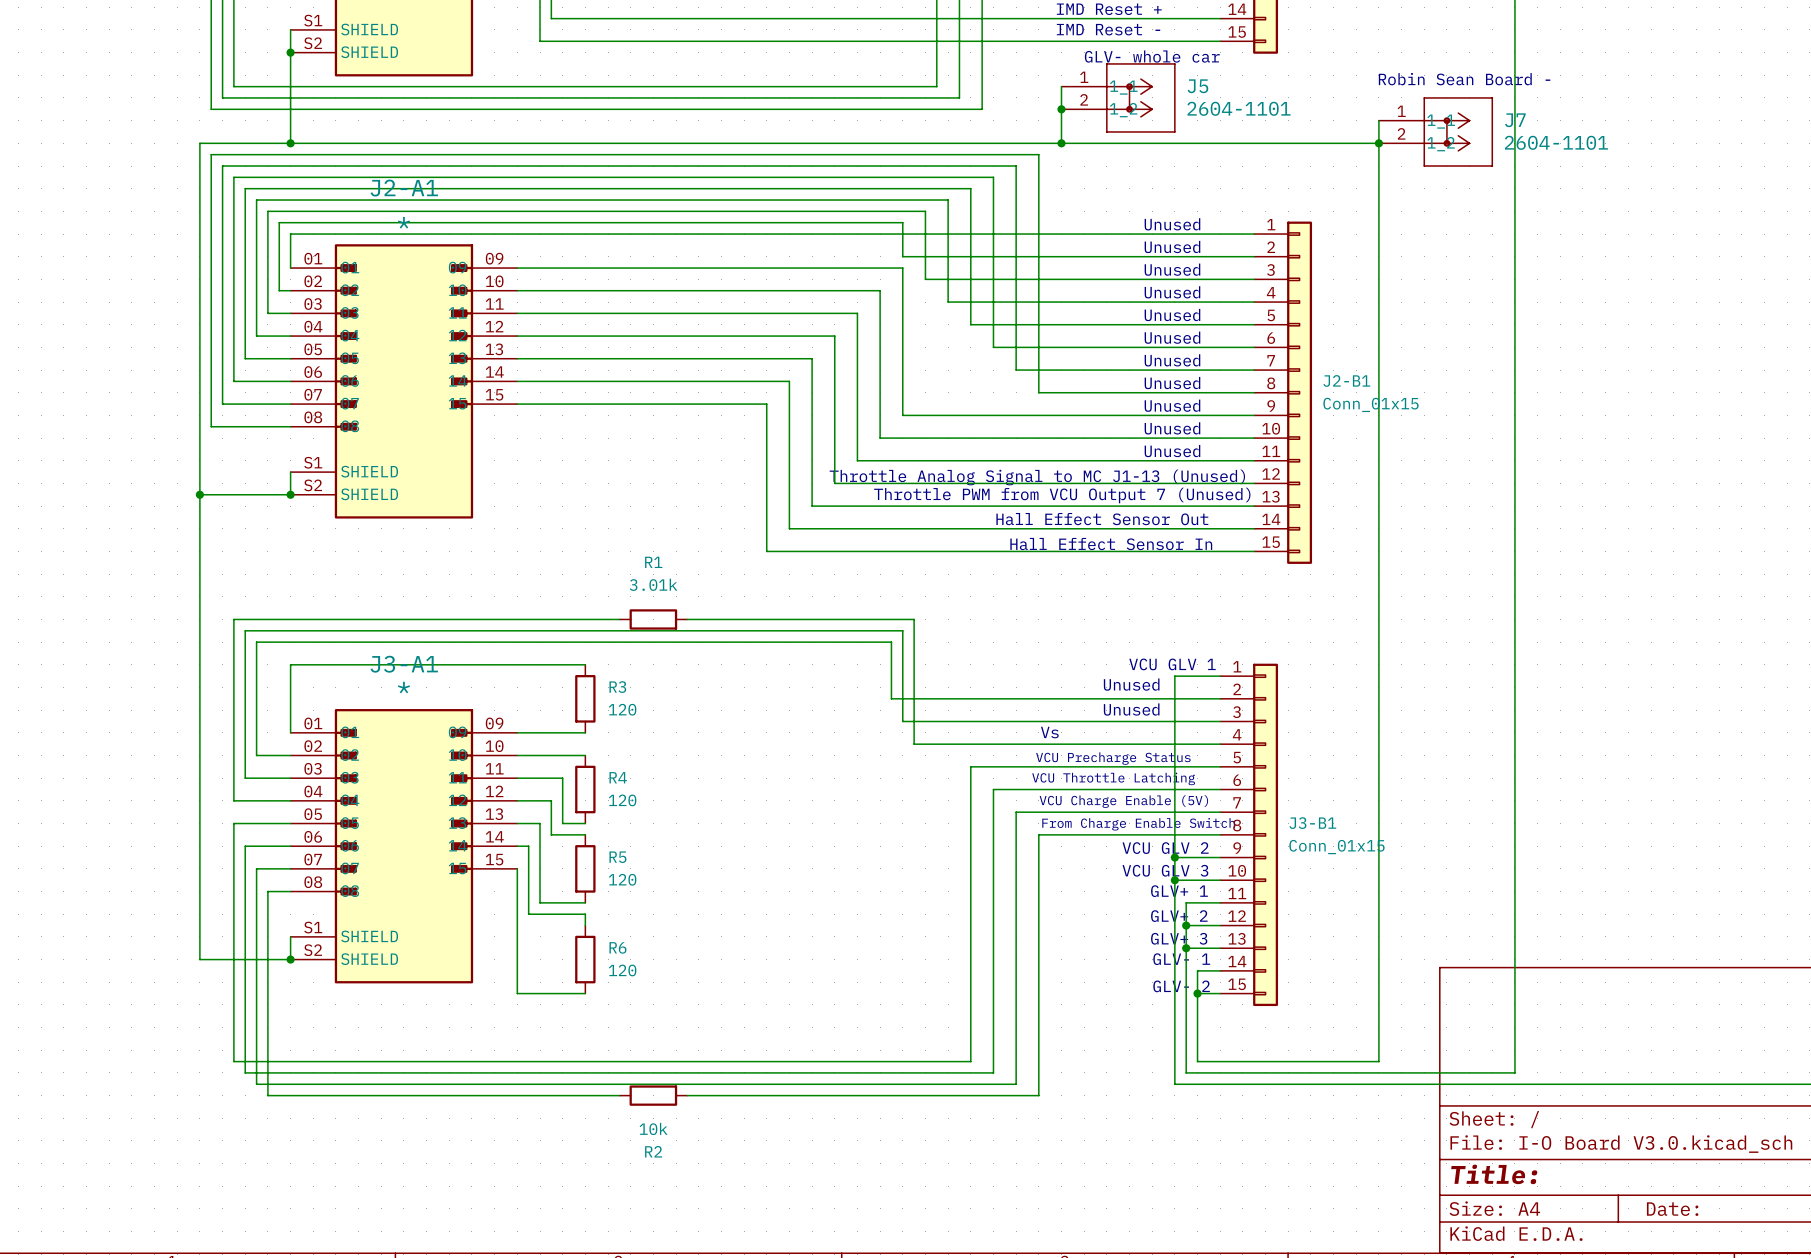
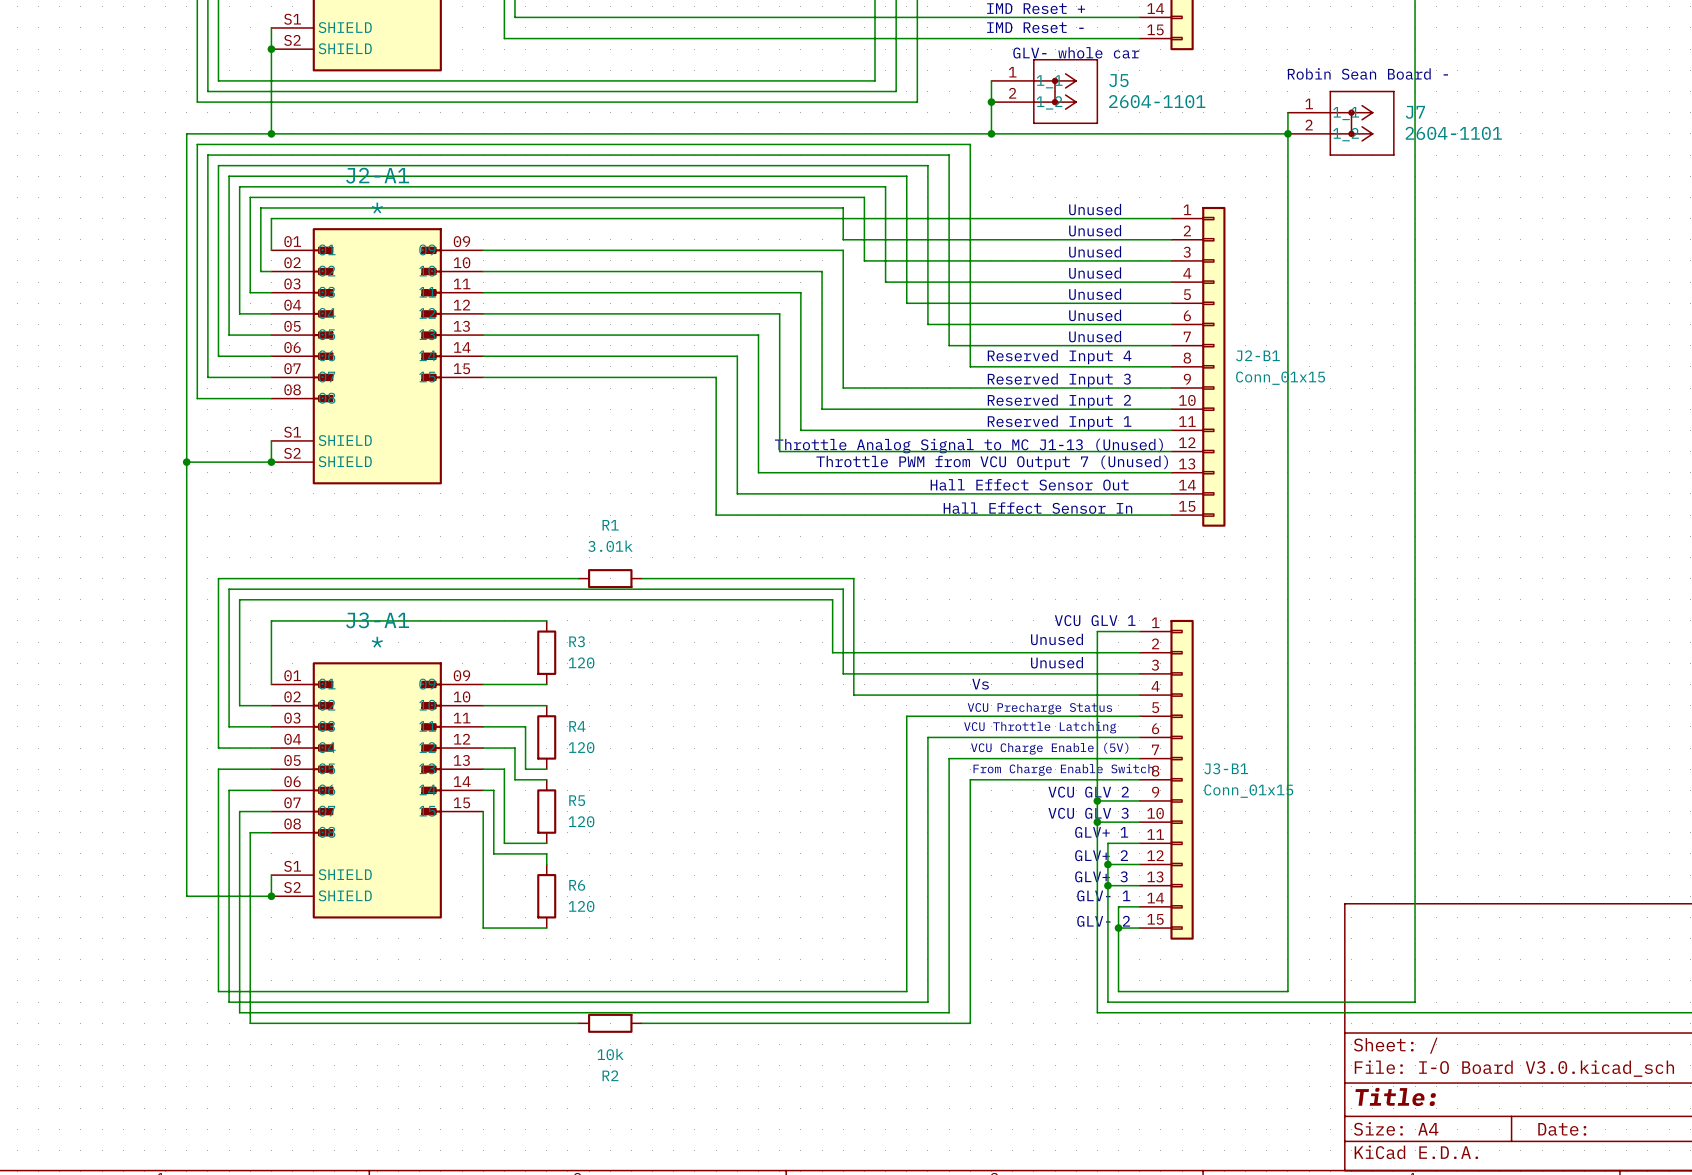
text: none -> Reserved Input 4 (1059, 357)
text: Unused (1172, 383) -> none
text: Unused (1172, 405) -> none
text: none -> Reserved Input 3 (1059, 380)
text: Unused (1172, 428) -> none
text: none -> Reserved Input 2 (1059, 401)
text: Unused (1172, 451) -> none
text: none -> Reserved Input 1 (1059, 422)

